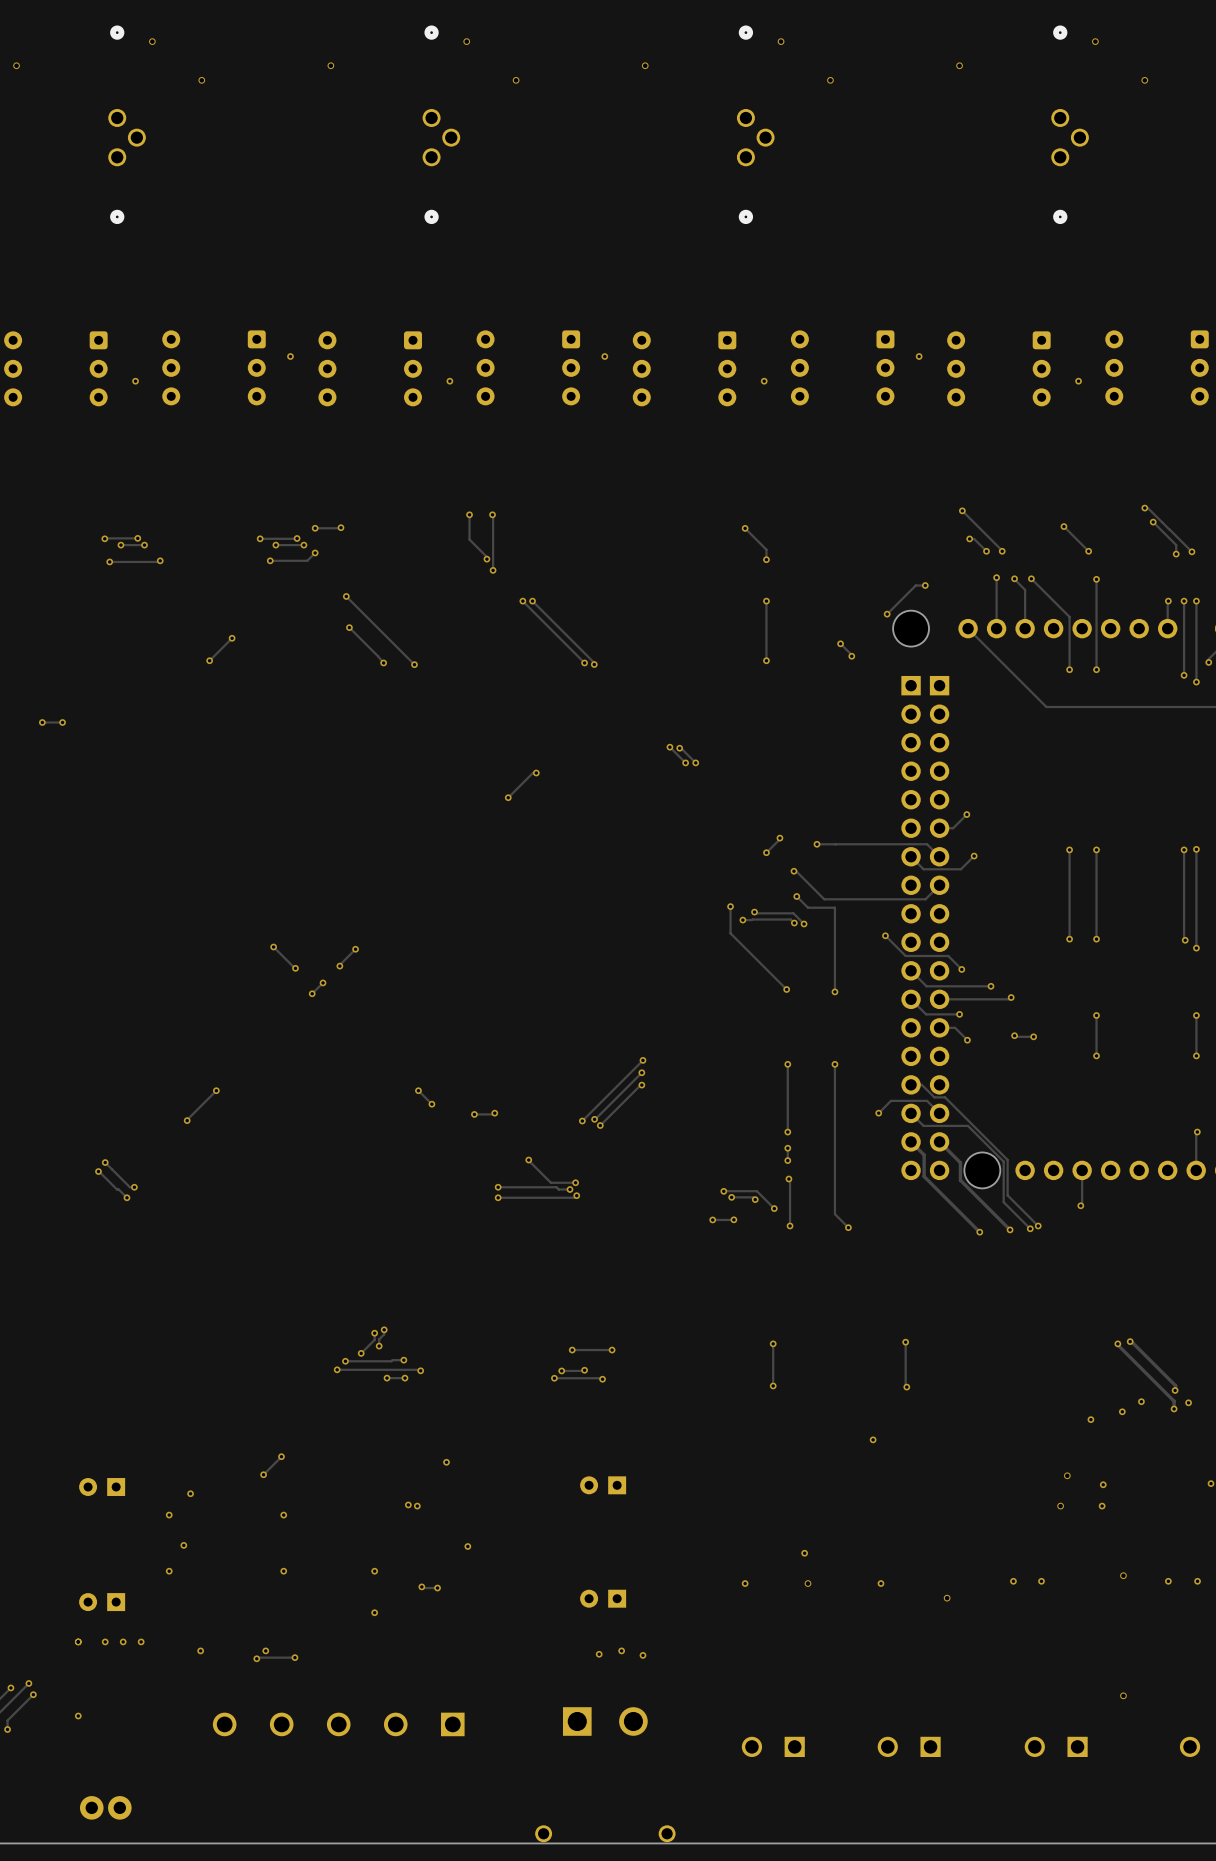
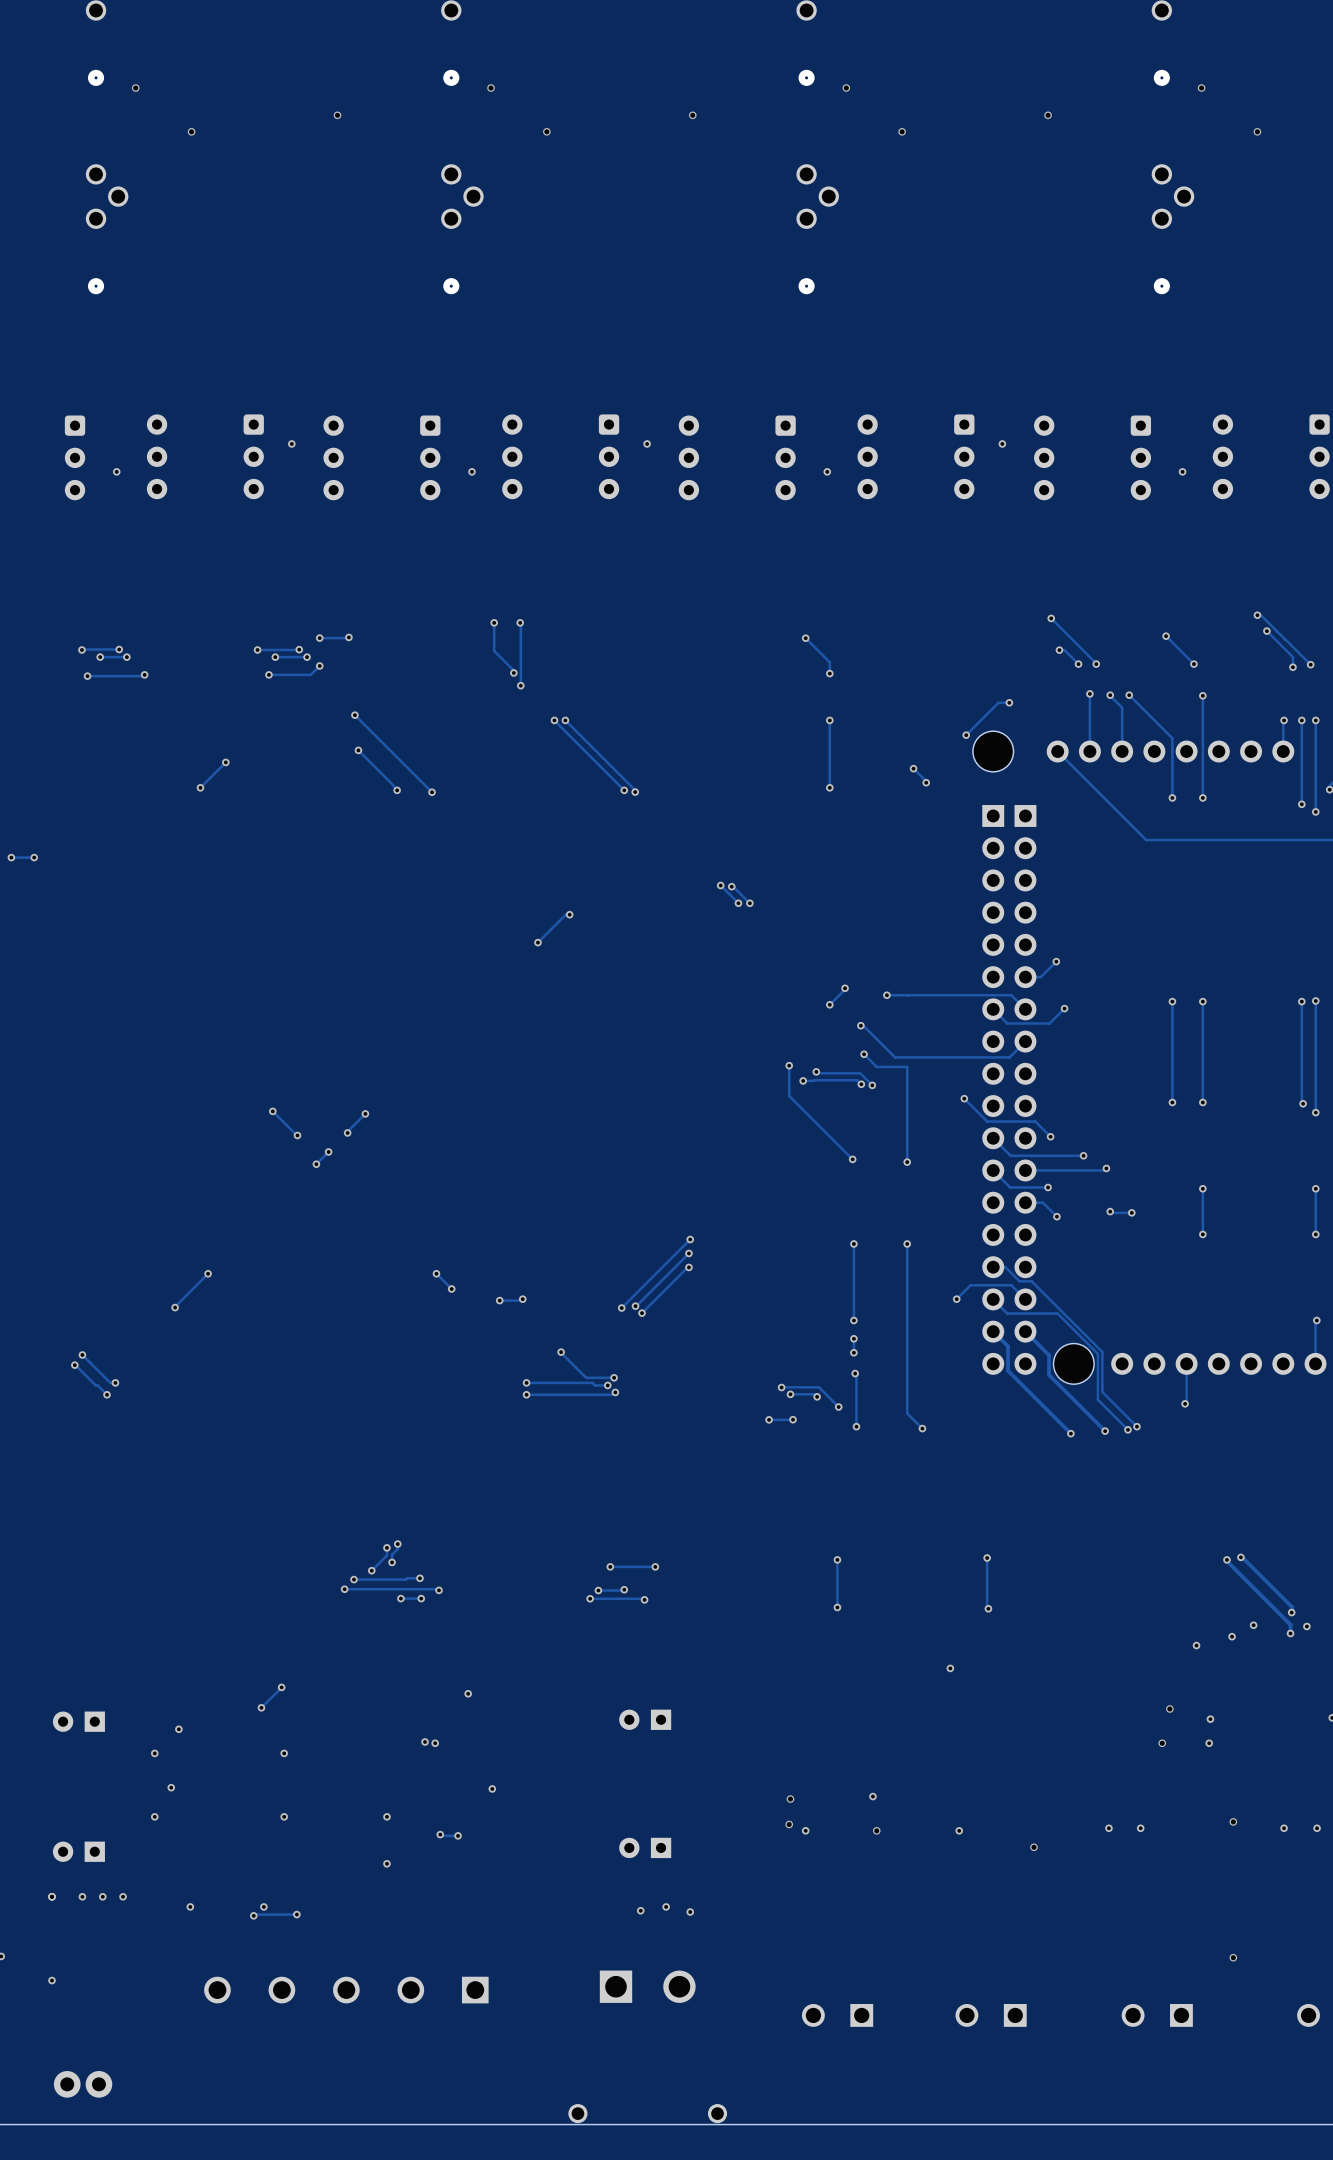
via: none -> (790, 1799)
via: none -> (789, 1824)

